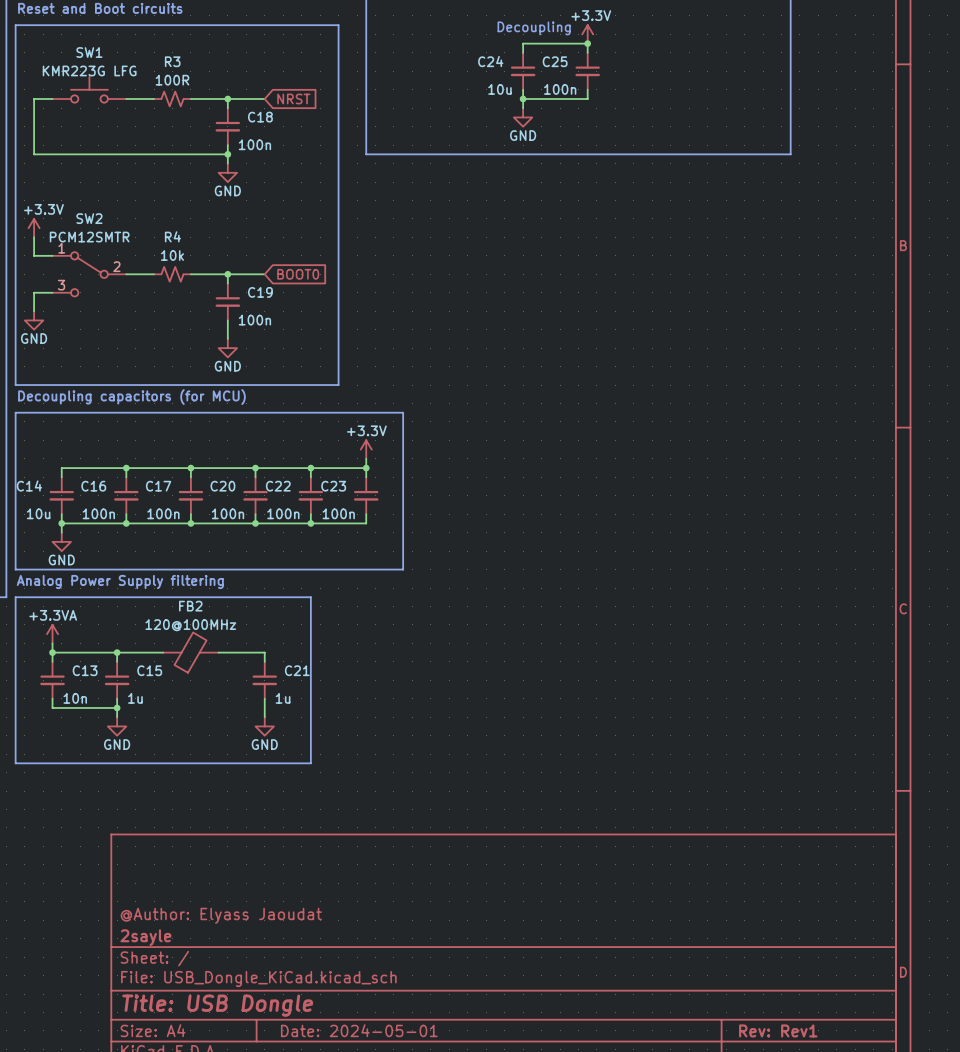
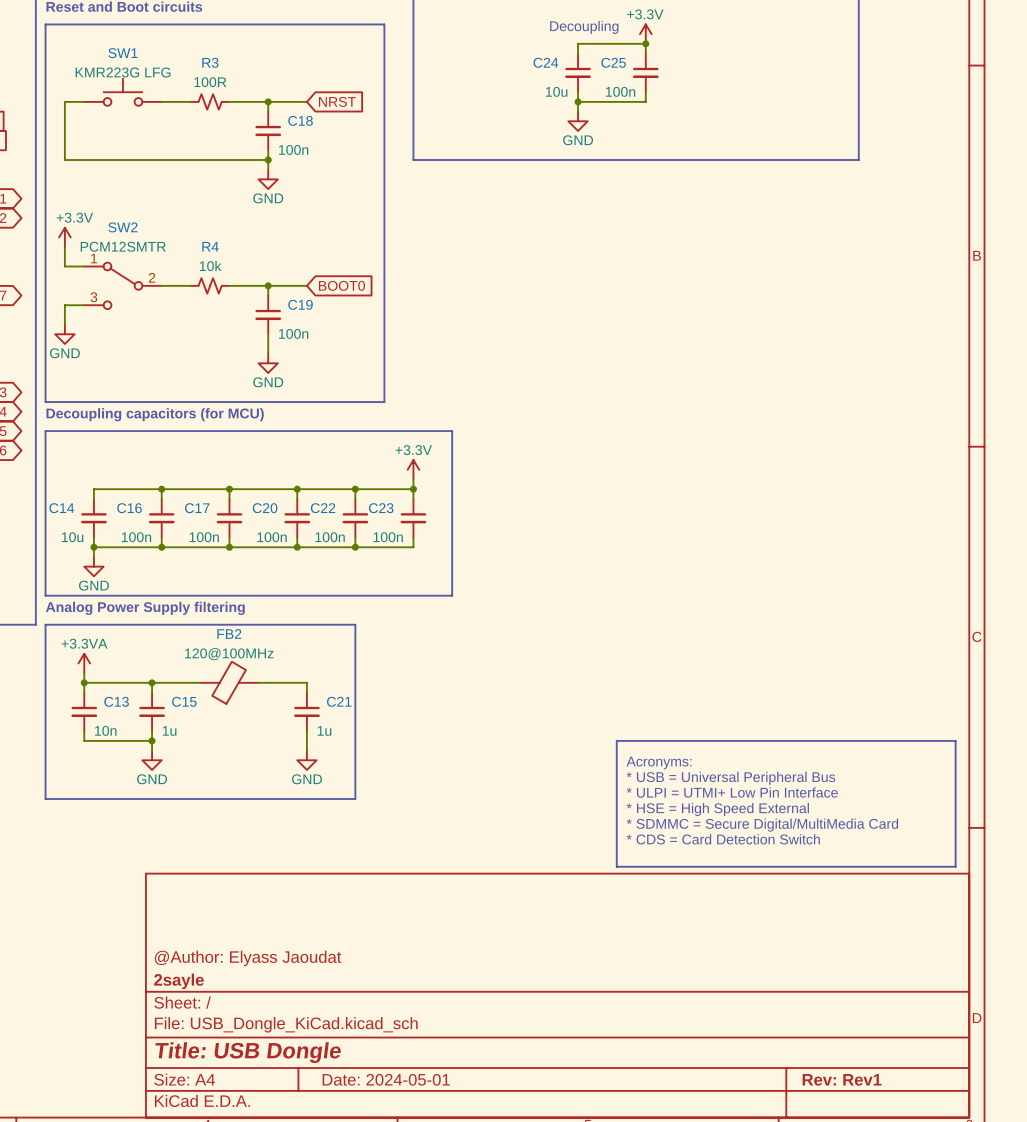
line: none -> (616, 740) (955, 740) (955, 866) (616, 866) (616, 740)
text: none -> Acronyms: (659, 762)
text: none -> * USB = Universal Peripheral Bus (730, 778)
text: none -> * ULPI = UTMI+ Low Pin Interface (732, 792)
text: none -> * HSE = High Speed External (717, 809)
text: none -> * SDMMC = Secure Digital/MultiMedia Card (762, 825)
text: none -> * CDS = Card Detection Switch (723, 839)

